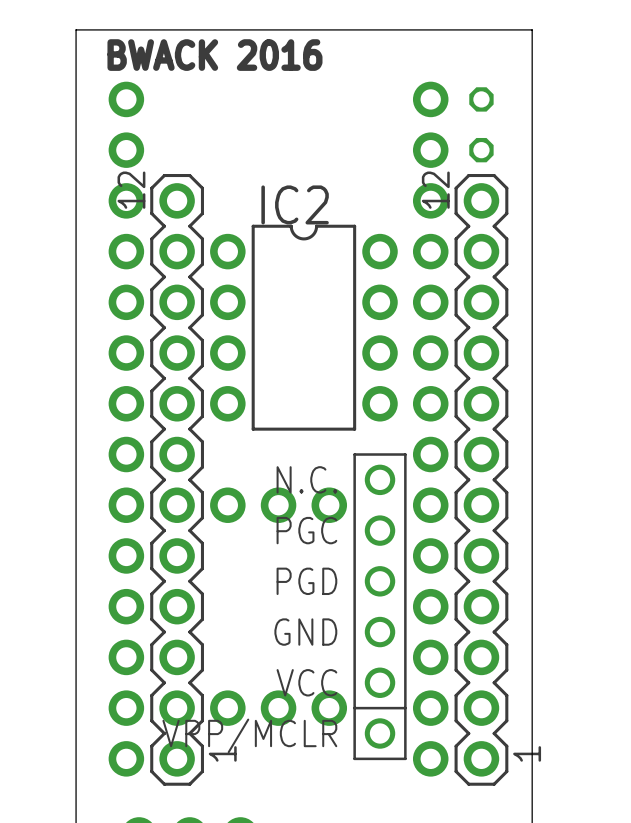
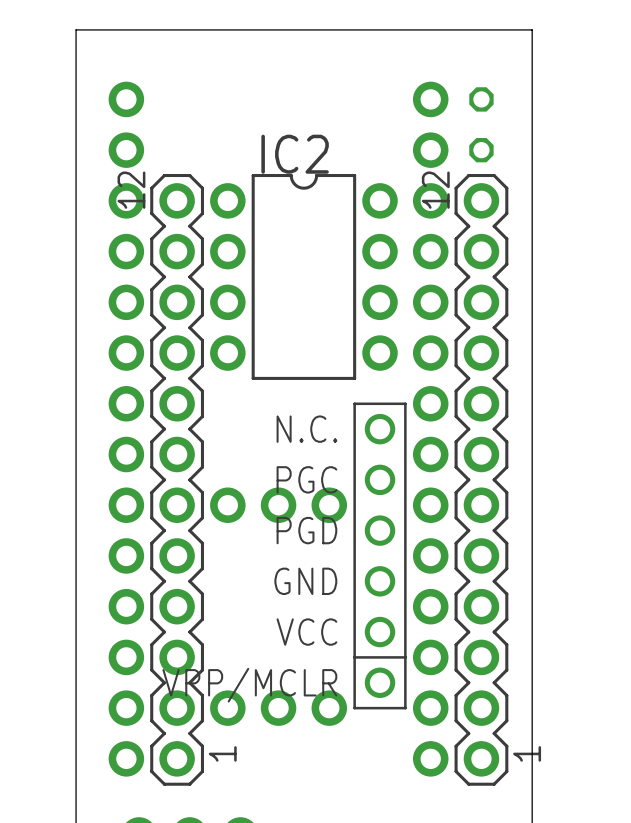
text: BWACK 2016 (214, 55) -> none
IC2 position: (303, 327) -> (303, 276)
part position: (380, 606) -> (380, 555)

